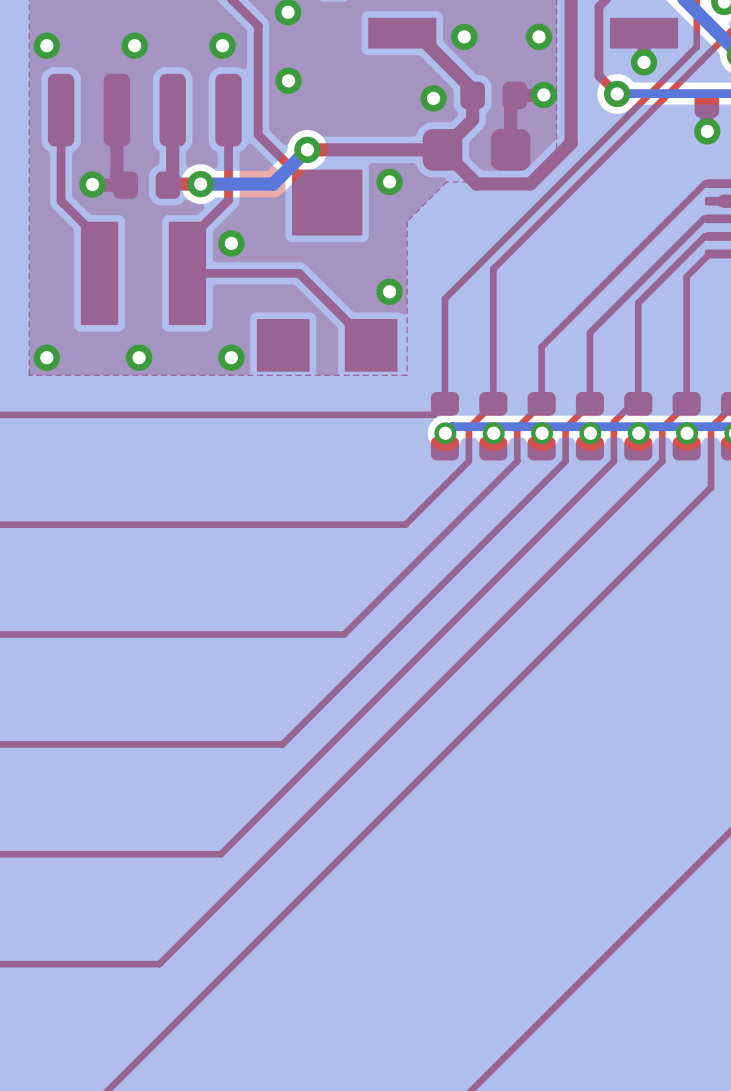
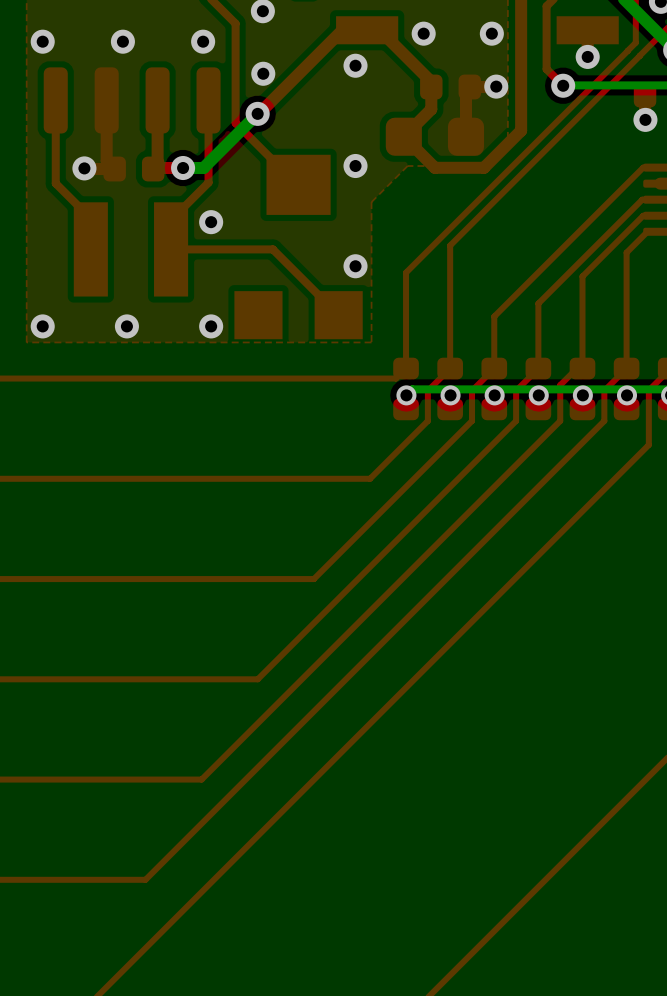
top track: none -> (342, 30) (257, 113)
via position: (433, 98) -> (355, 65)
bottom track: (307, 149) (273, 184) (223, 184) -> (257, 113) (203, 168)
via position: (307, 149) -> (257, 113)
top track: (442, 149) (307, 149) -> none

